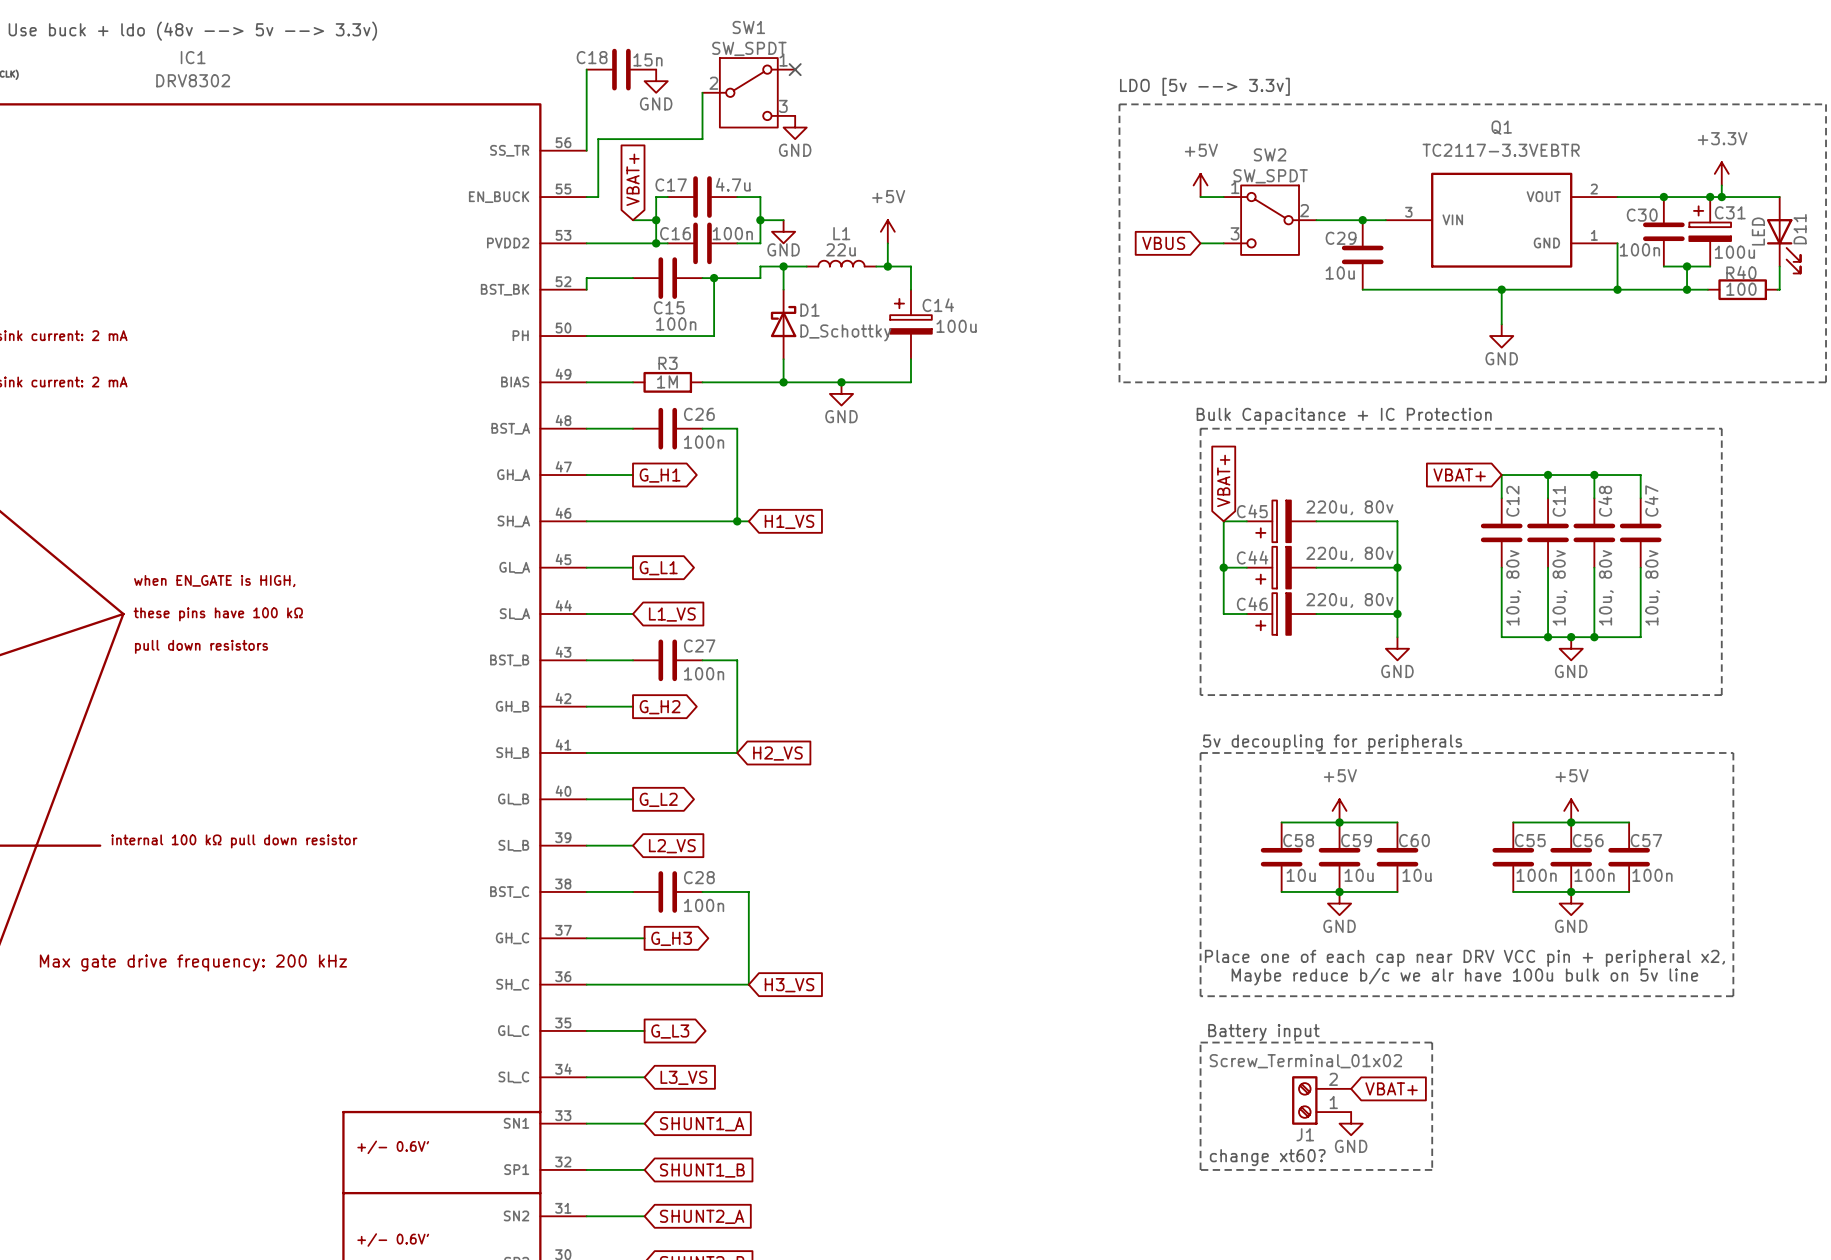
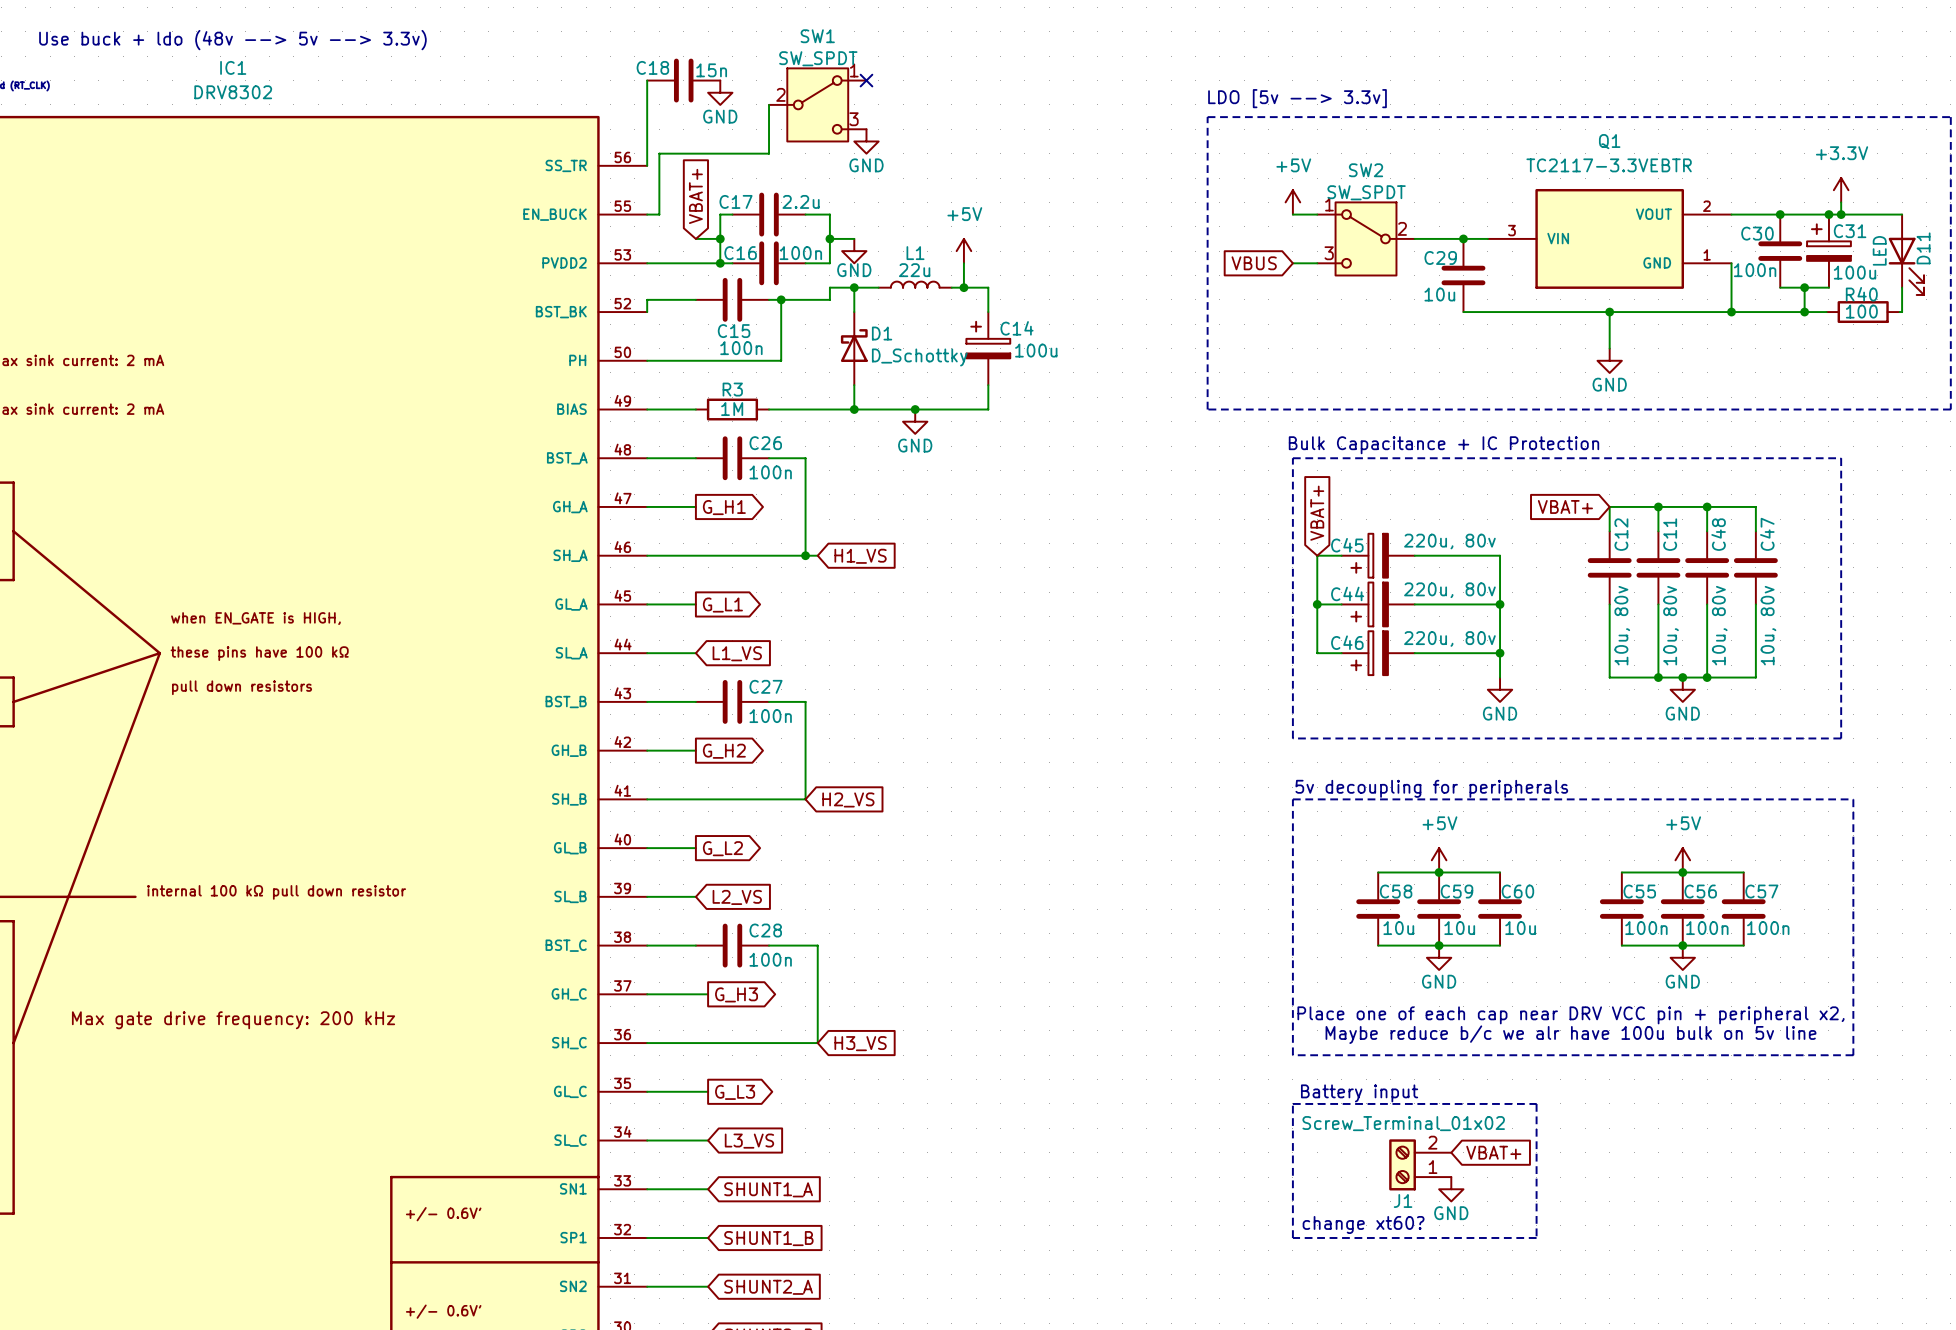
C17 value: 4.7u (733, 184) -> 2.2u (801, 201)

